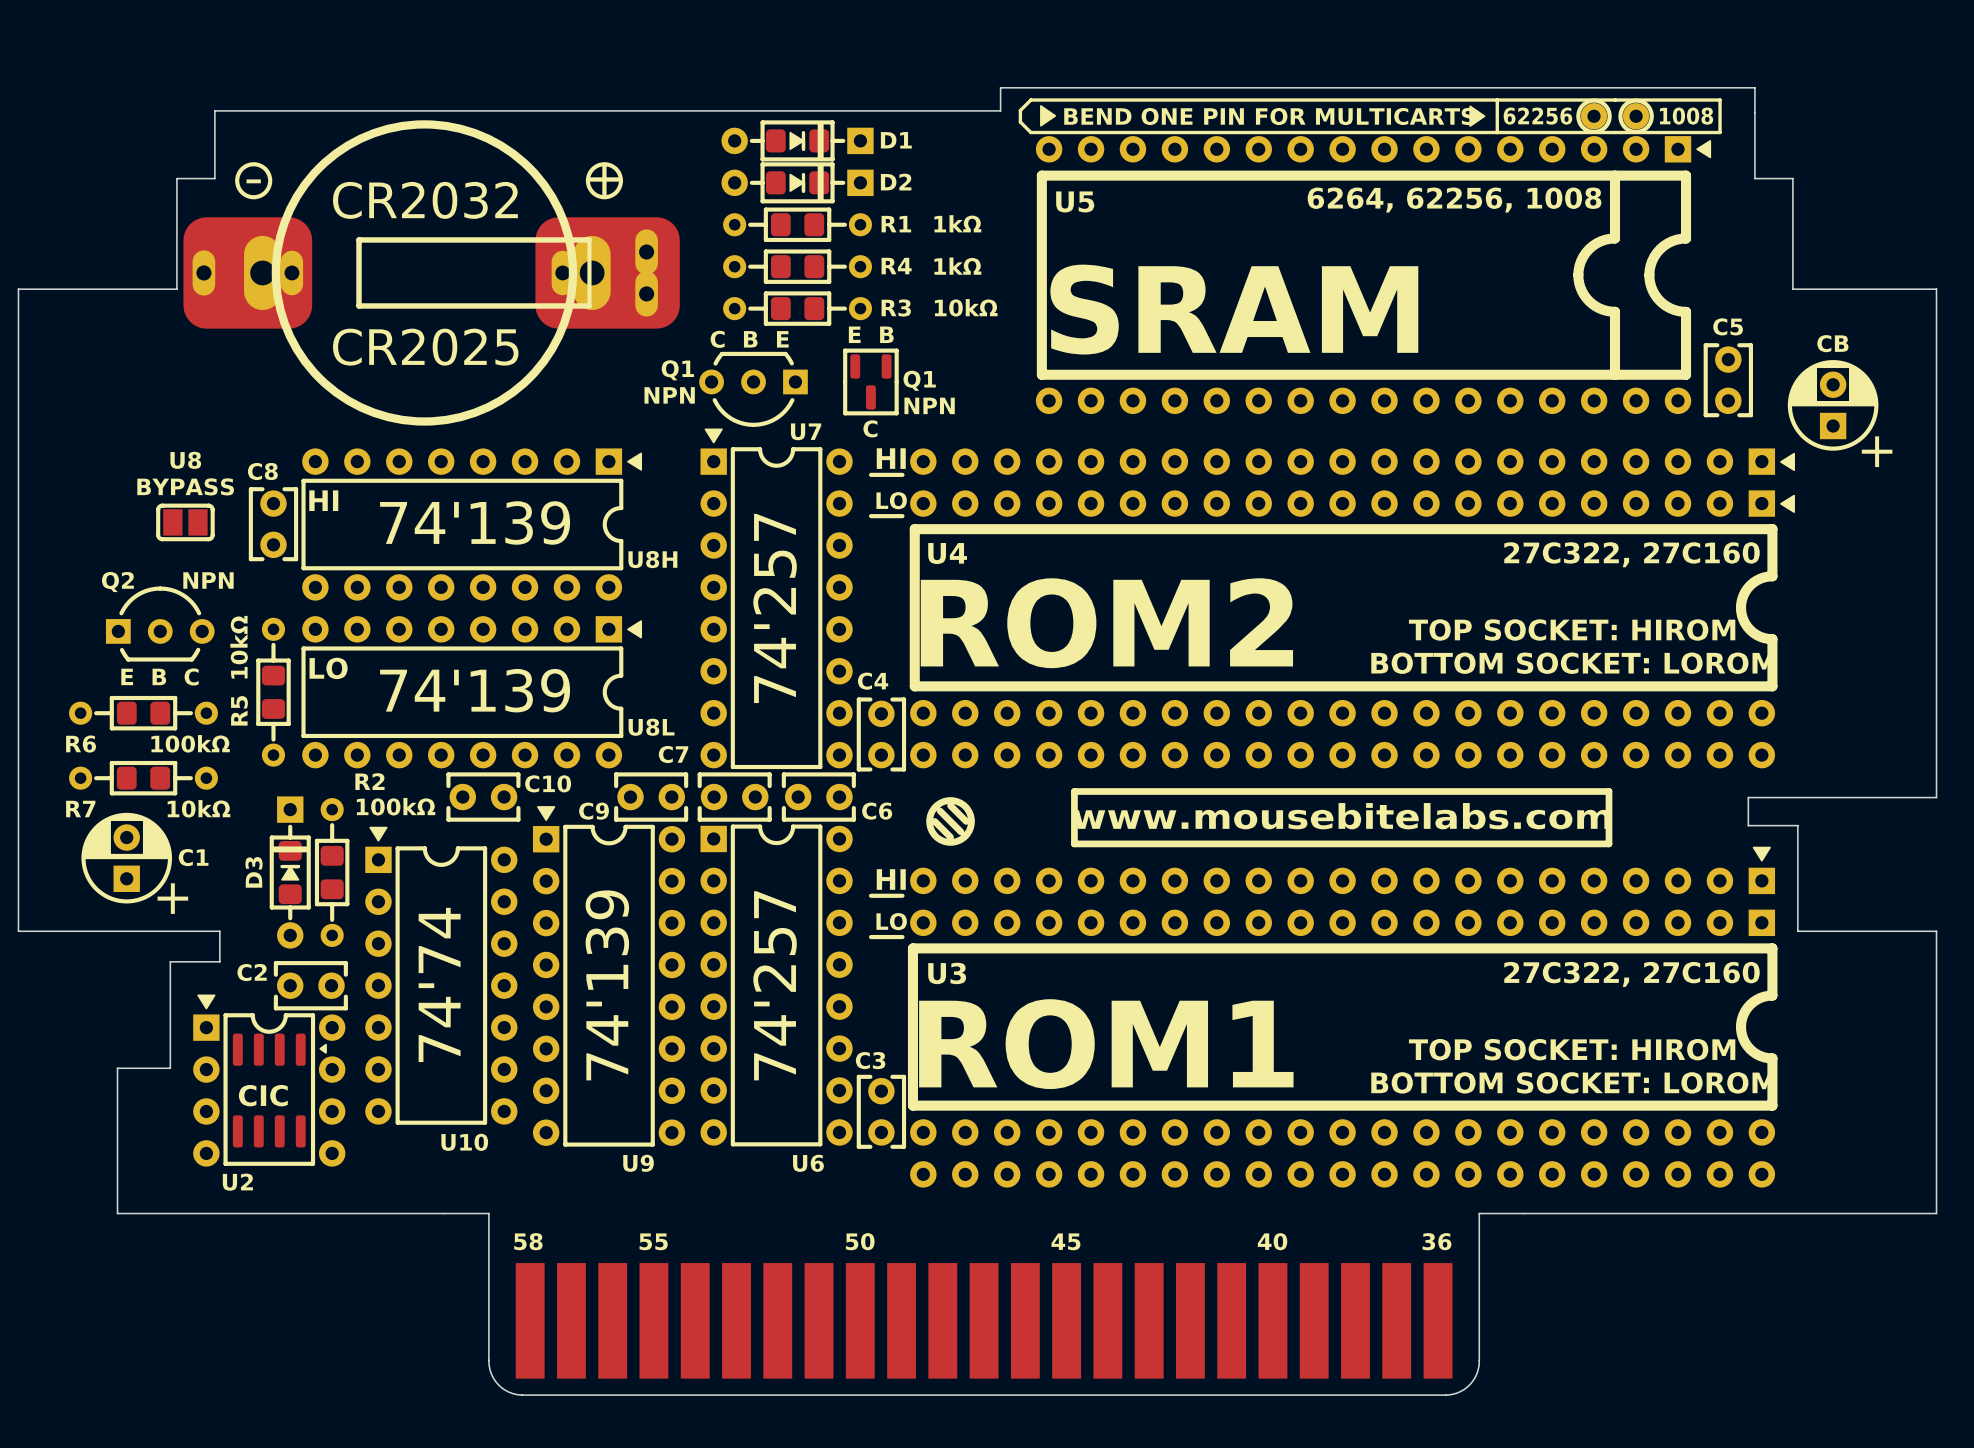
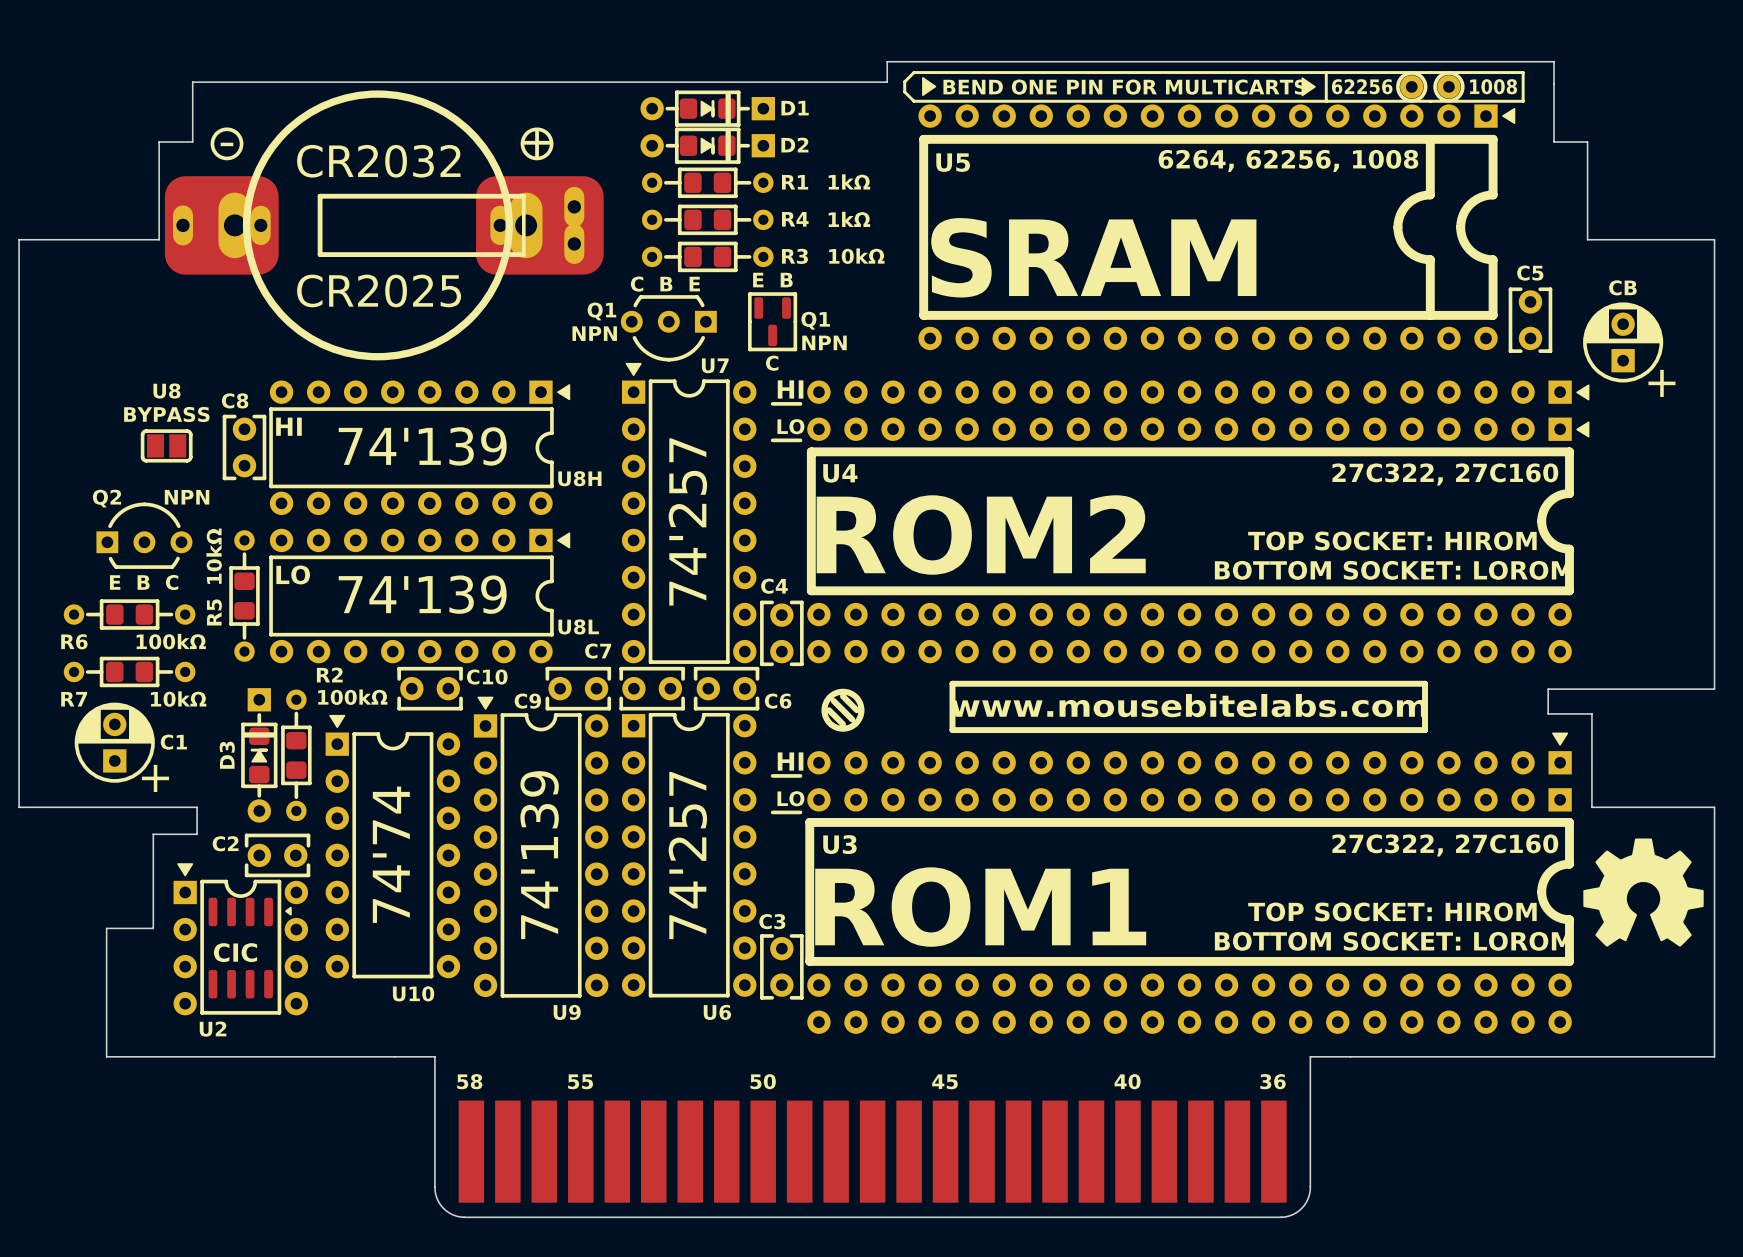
drawing: none -> [1583, 838, 1704, 947]

